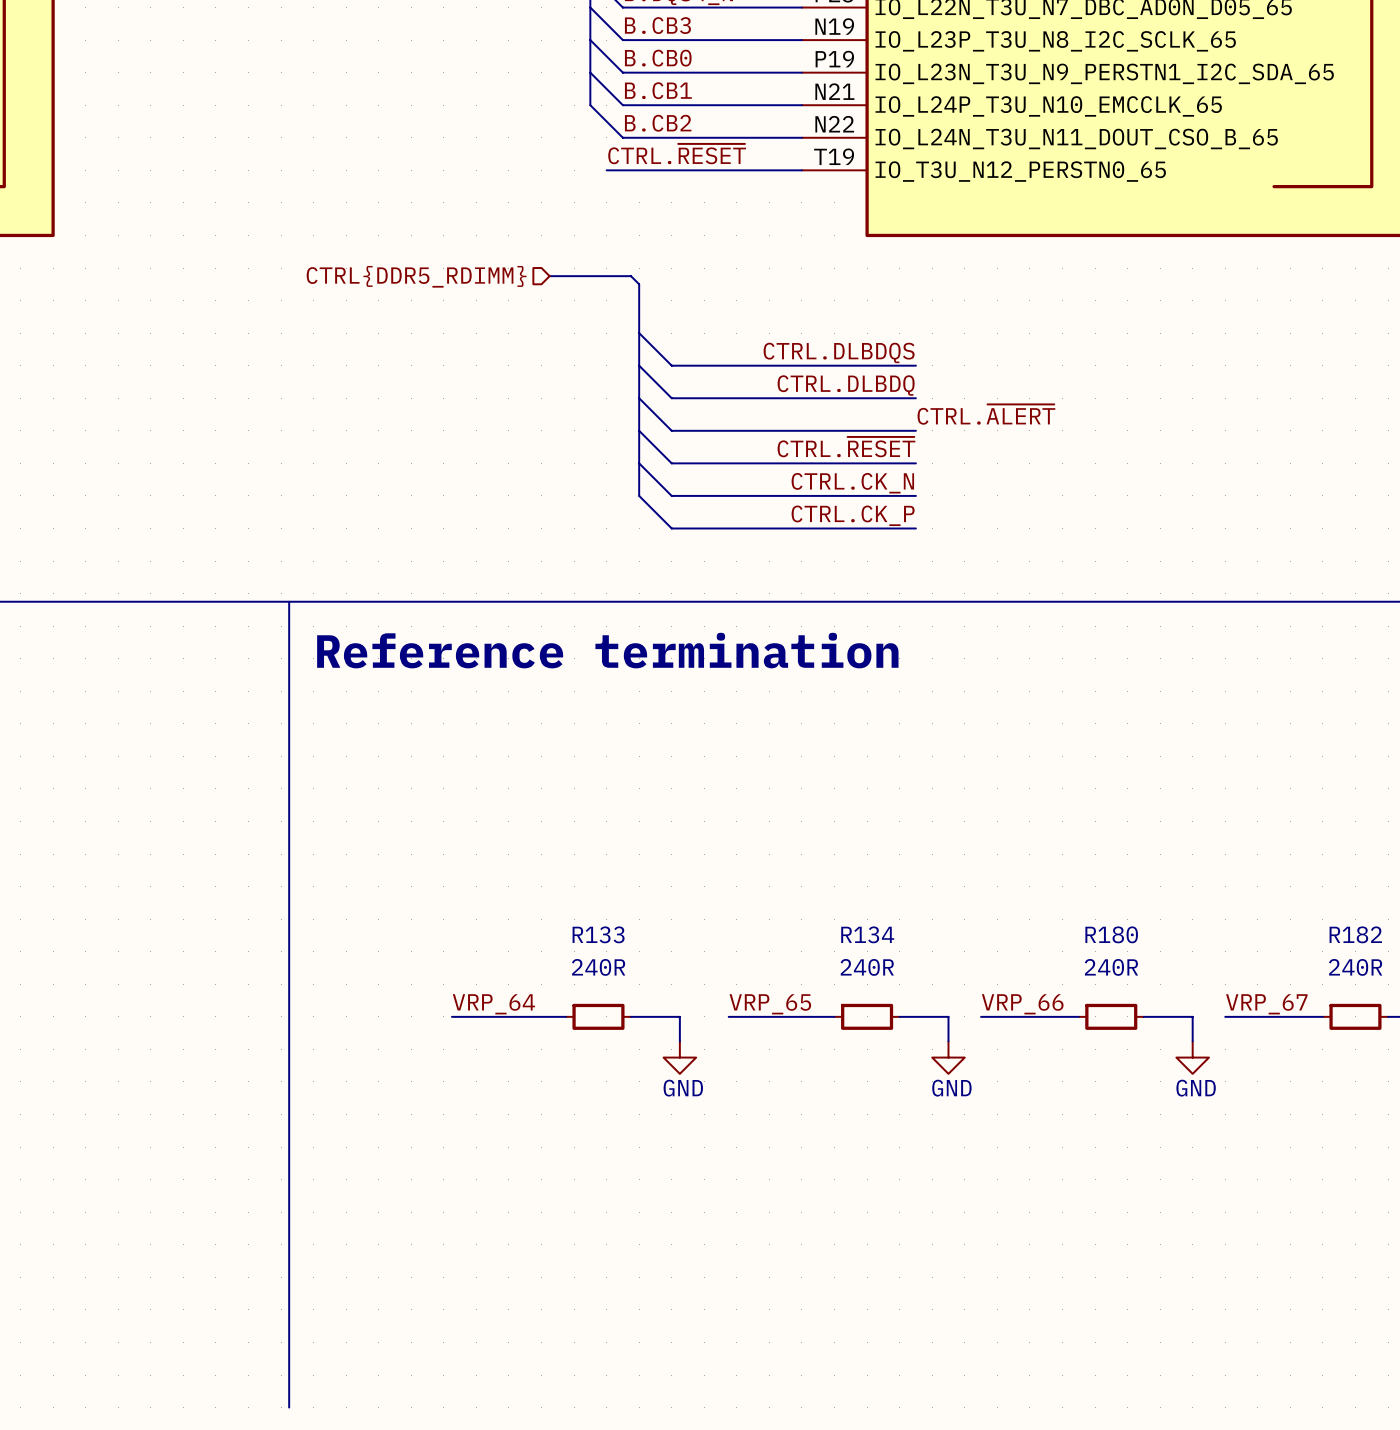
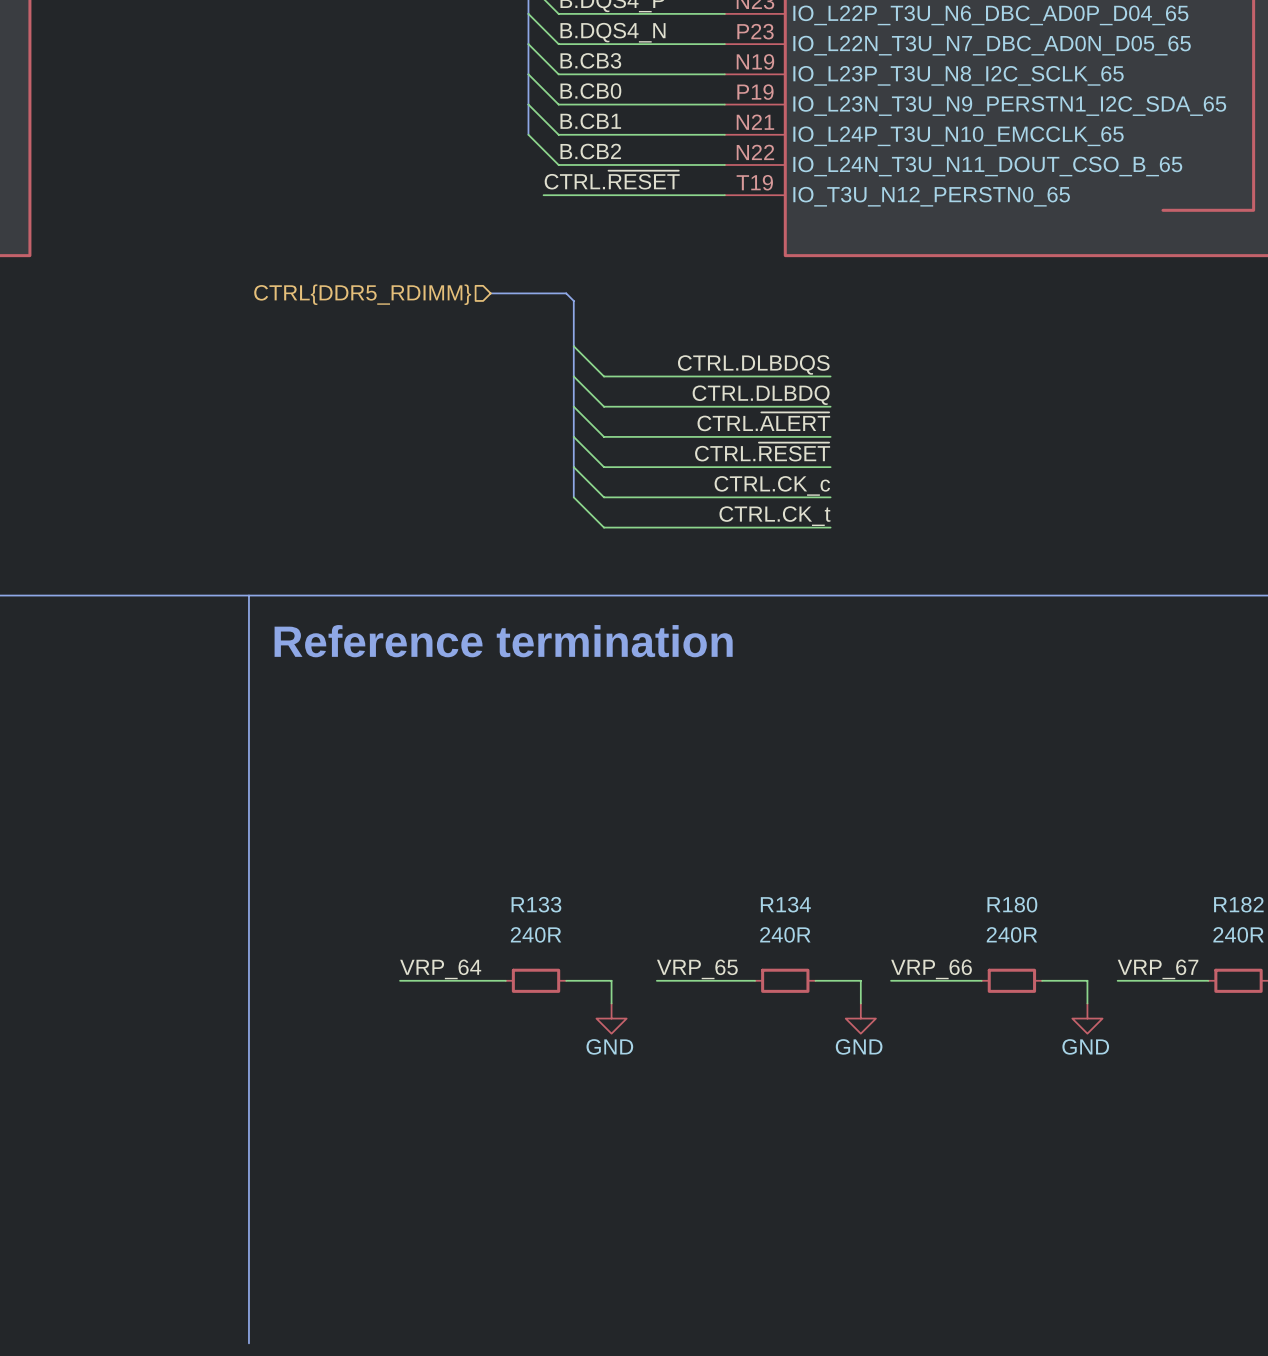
label position: CTRL.~{ALERT} (986, 414) -> CTRL.~{ALERT} (763, 421)
label: CTRL.CK_N (852, 483) -> CTRL.CK_c (772, 485)
label: CTRL.CK_P (853, 515) -> CTRL.CK_t (774, 516)

